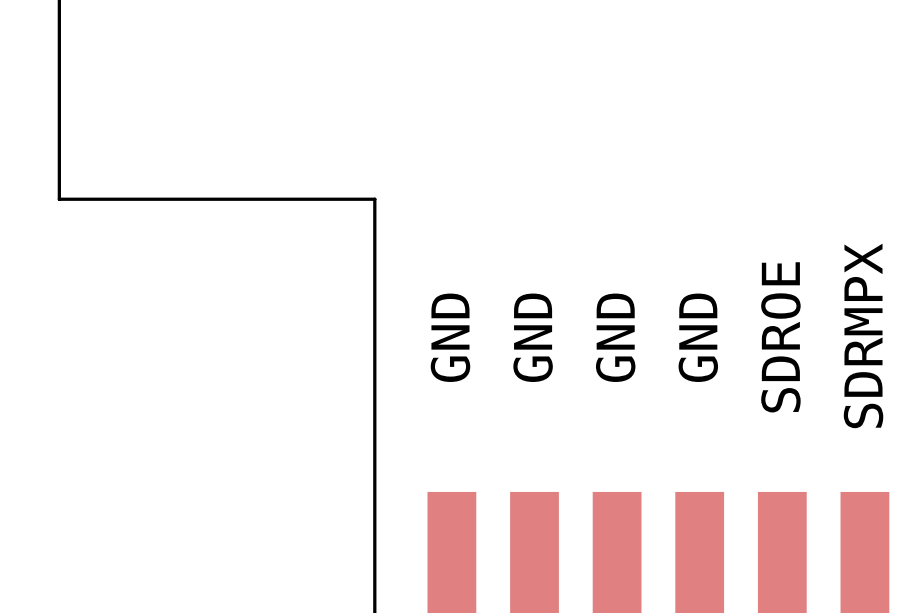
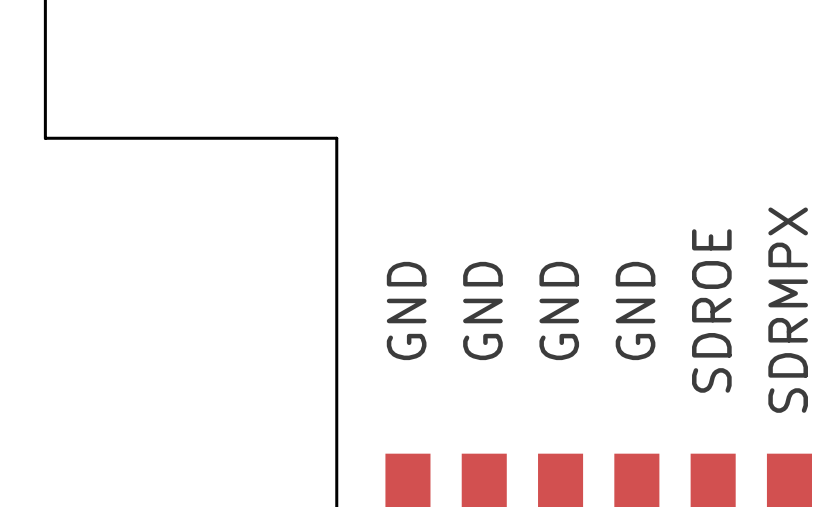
board edge: (59, 150) (59, 199) (374, 199) -> (45, 138) (336, 138) (336, 183)

